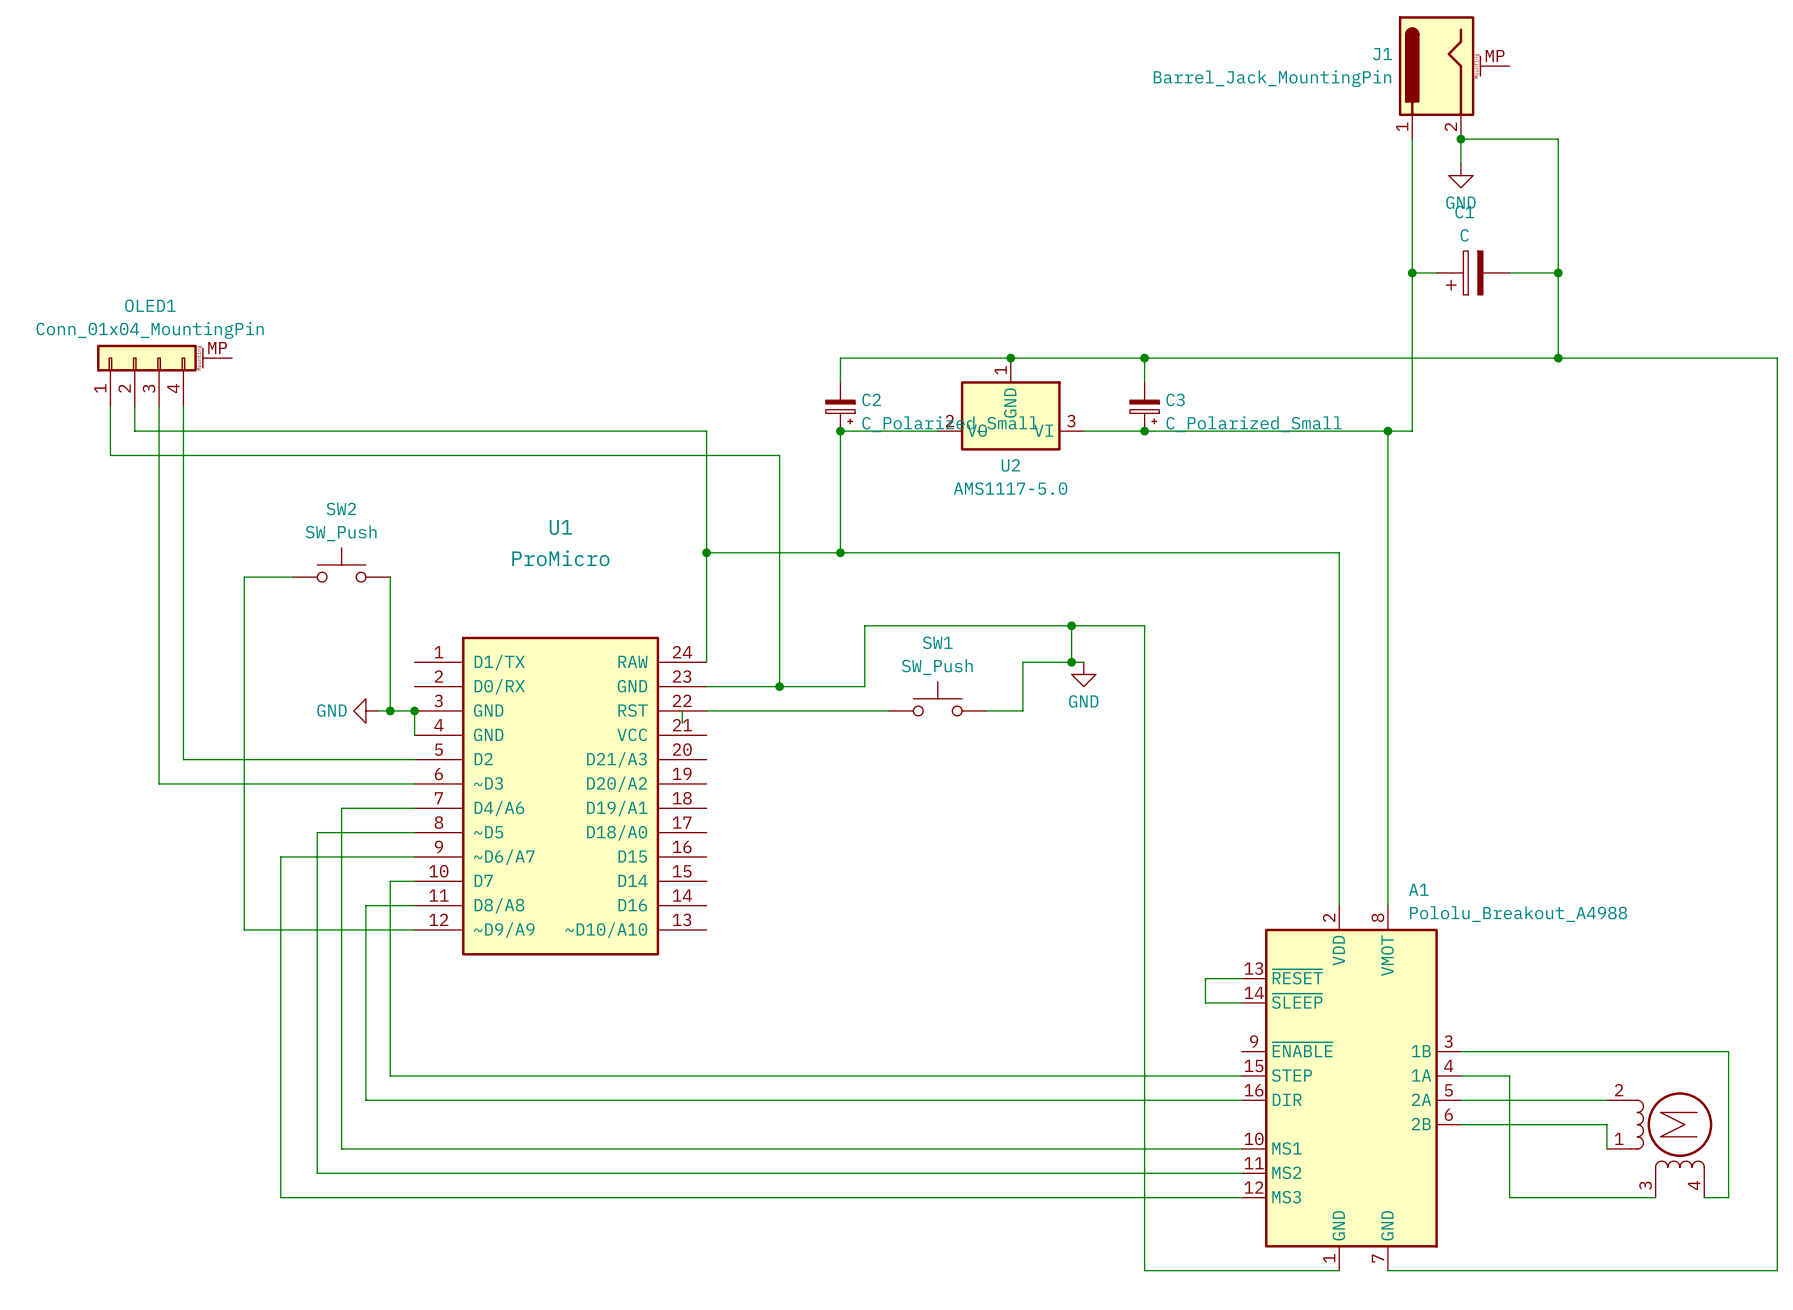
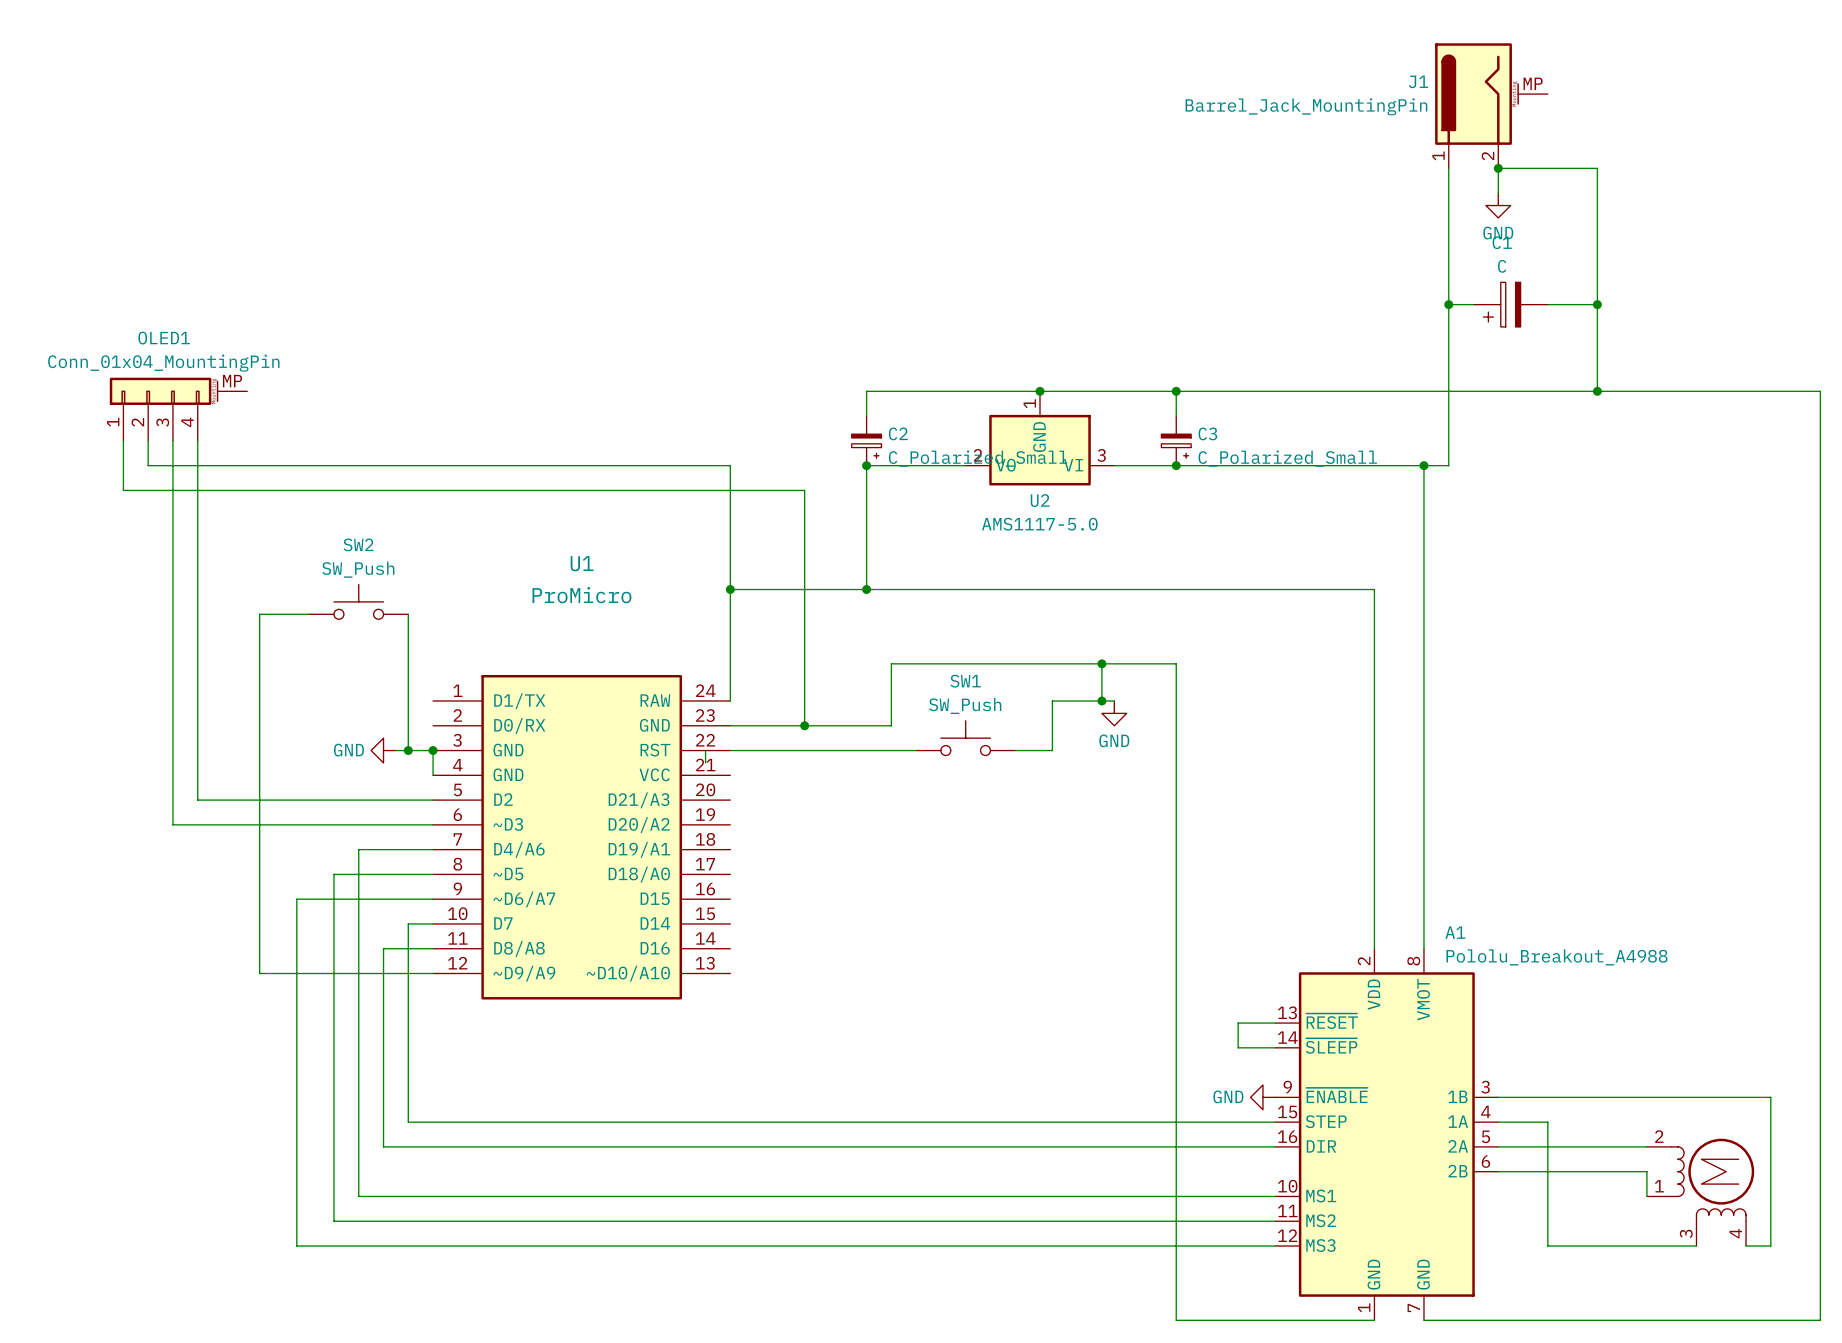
power symbol: none -> GND (1262, 1097)

